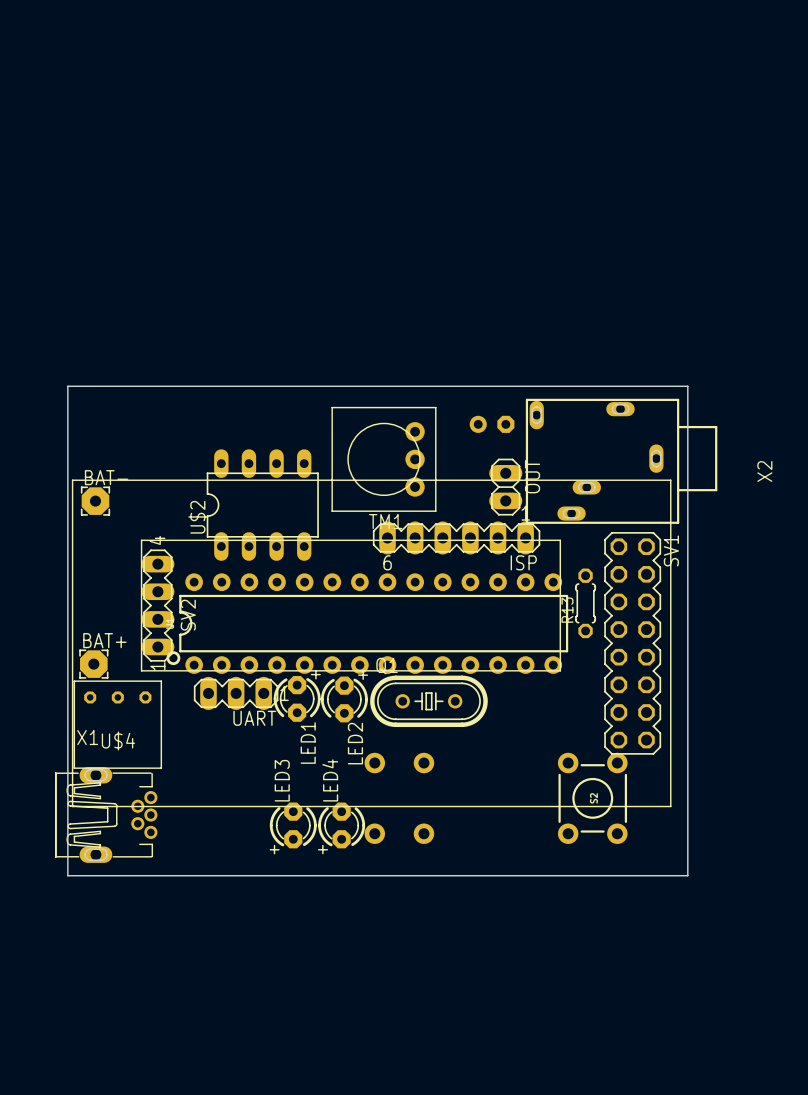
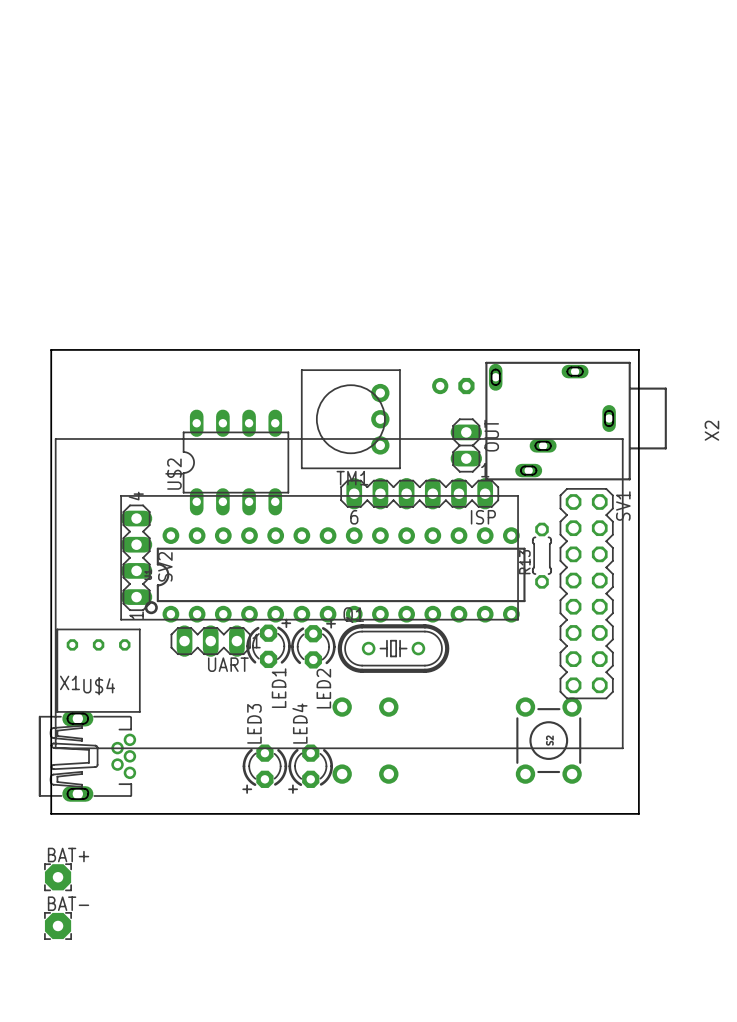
BAT-: (95, 501) -> none
BAT+: (93, 664) -> none
BAT+: none -> (58, 877)
BAT-: none -> (58, 925)

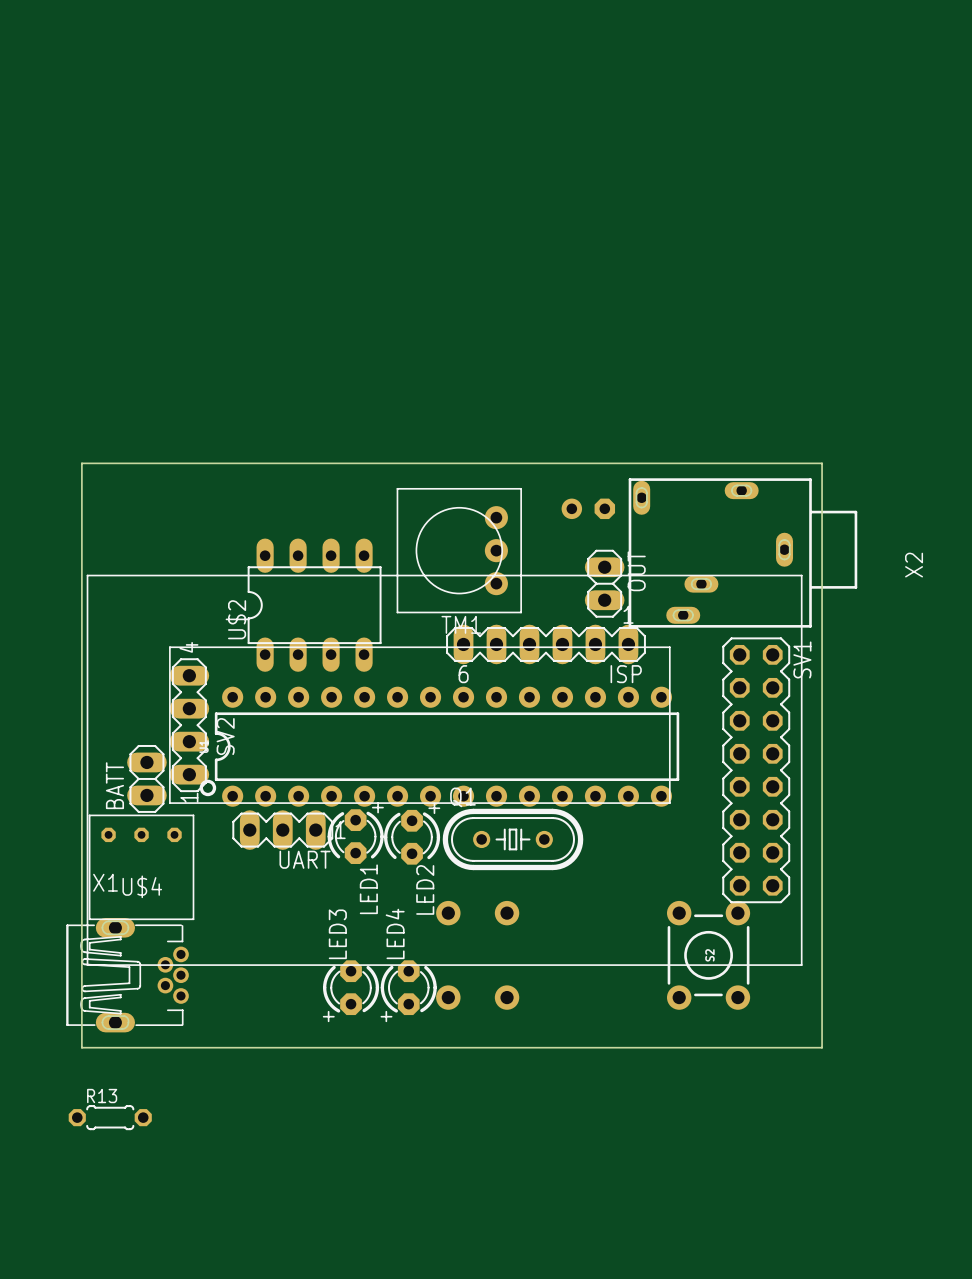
R13 rotation: 0° (541, 555) -> 90° clockwise (110, 1117)
R13 position: (541, 555) -> (110, 1117)
BATT: none -> (146, 778)
BAT+: (58, 877) -> none
BAT-: (58, 925) -> none

